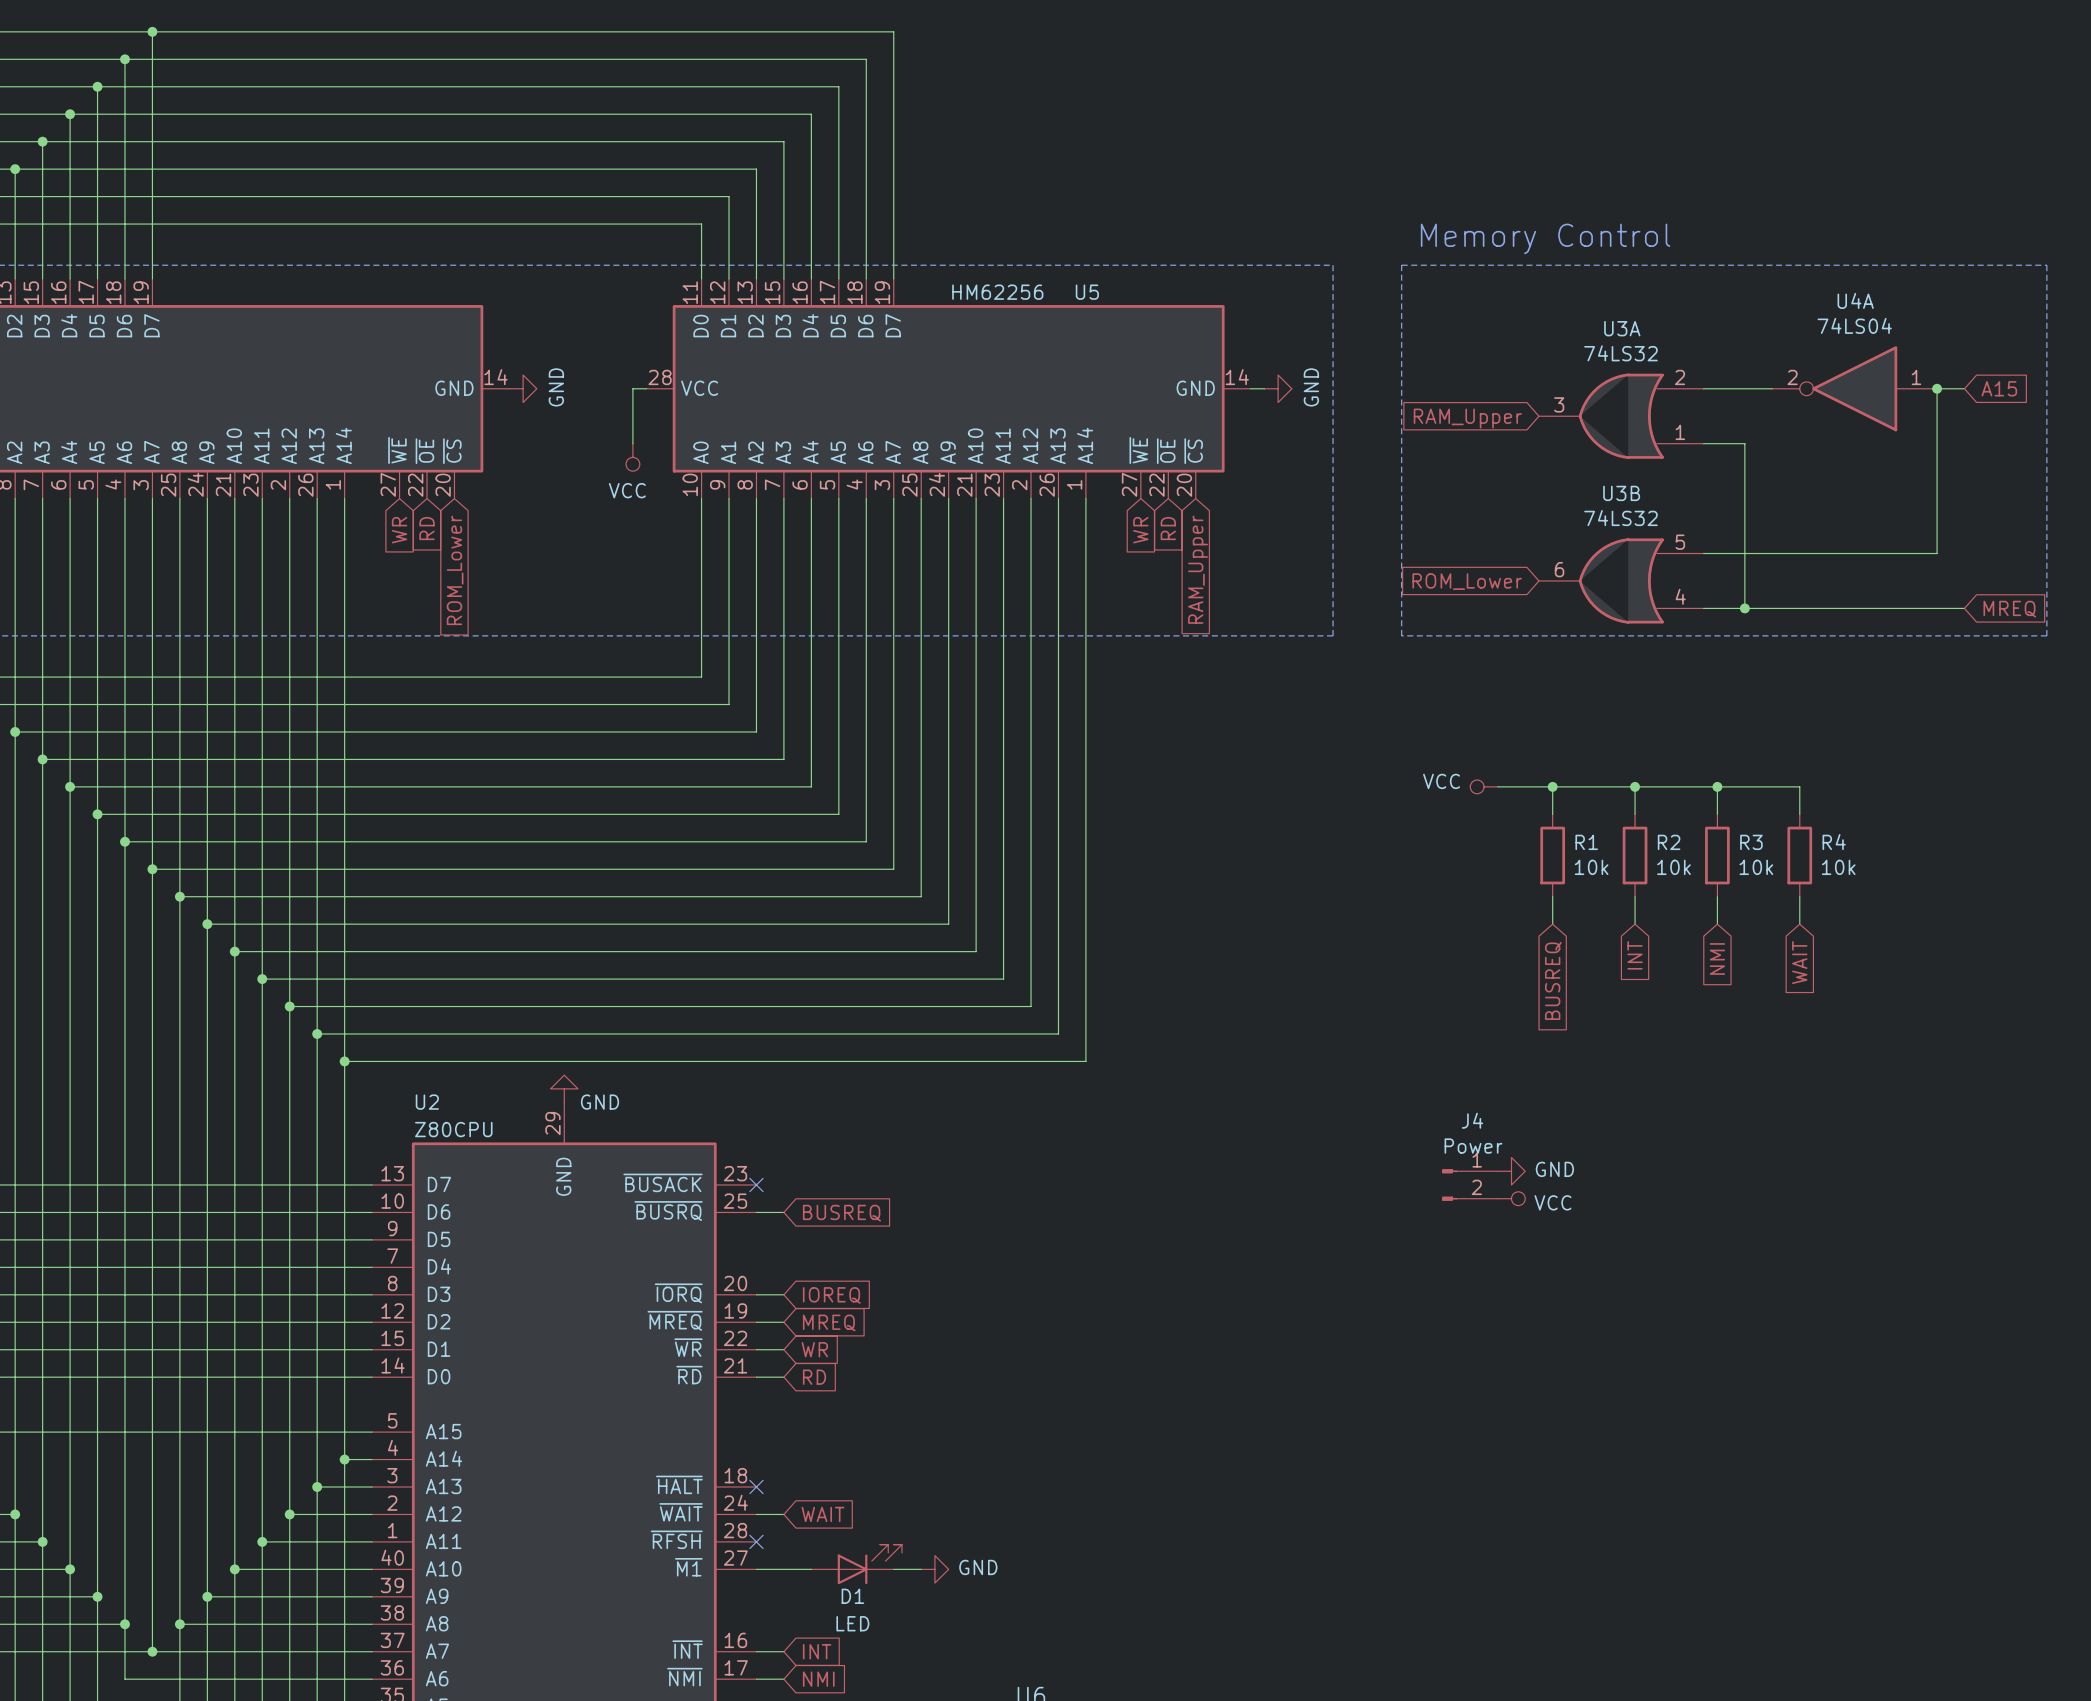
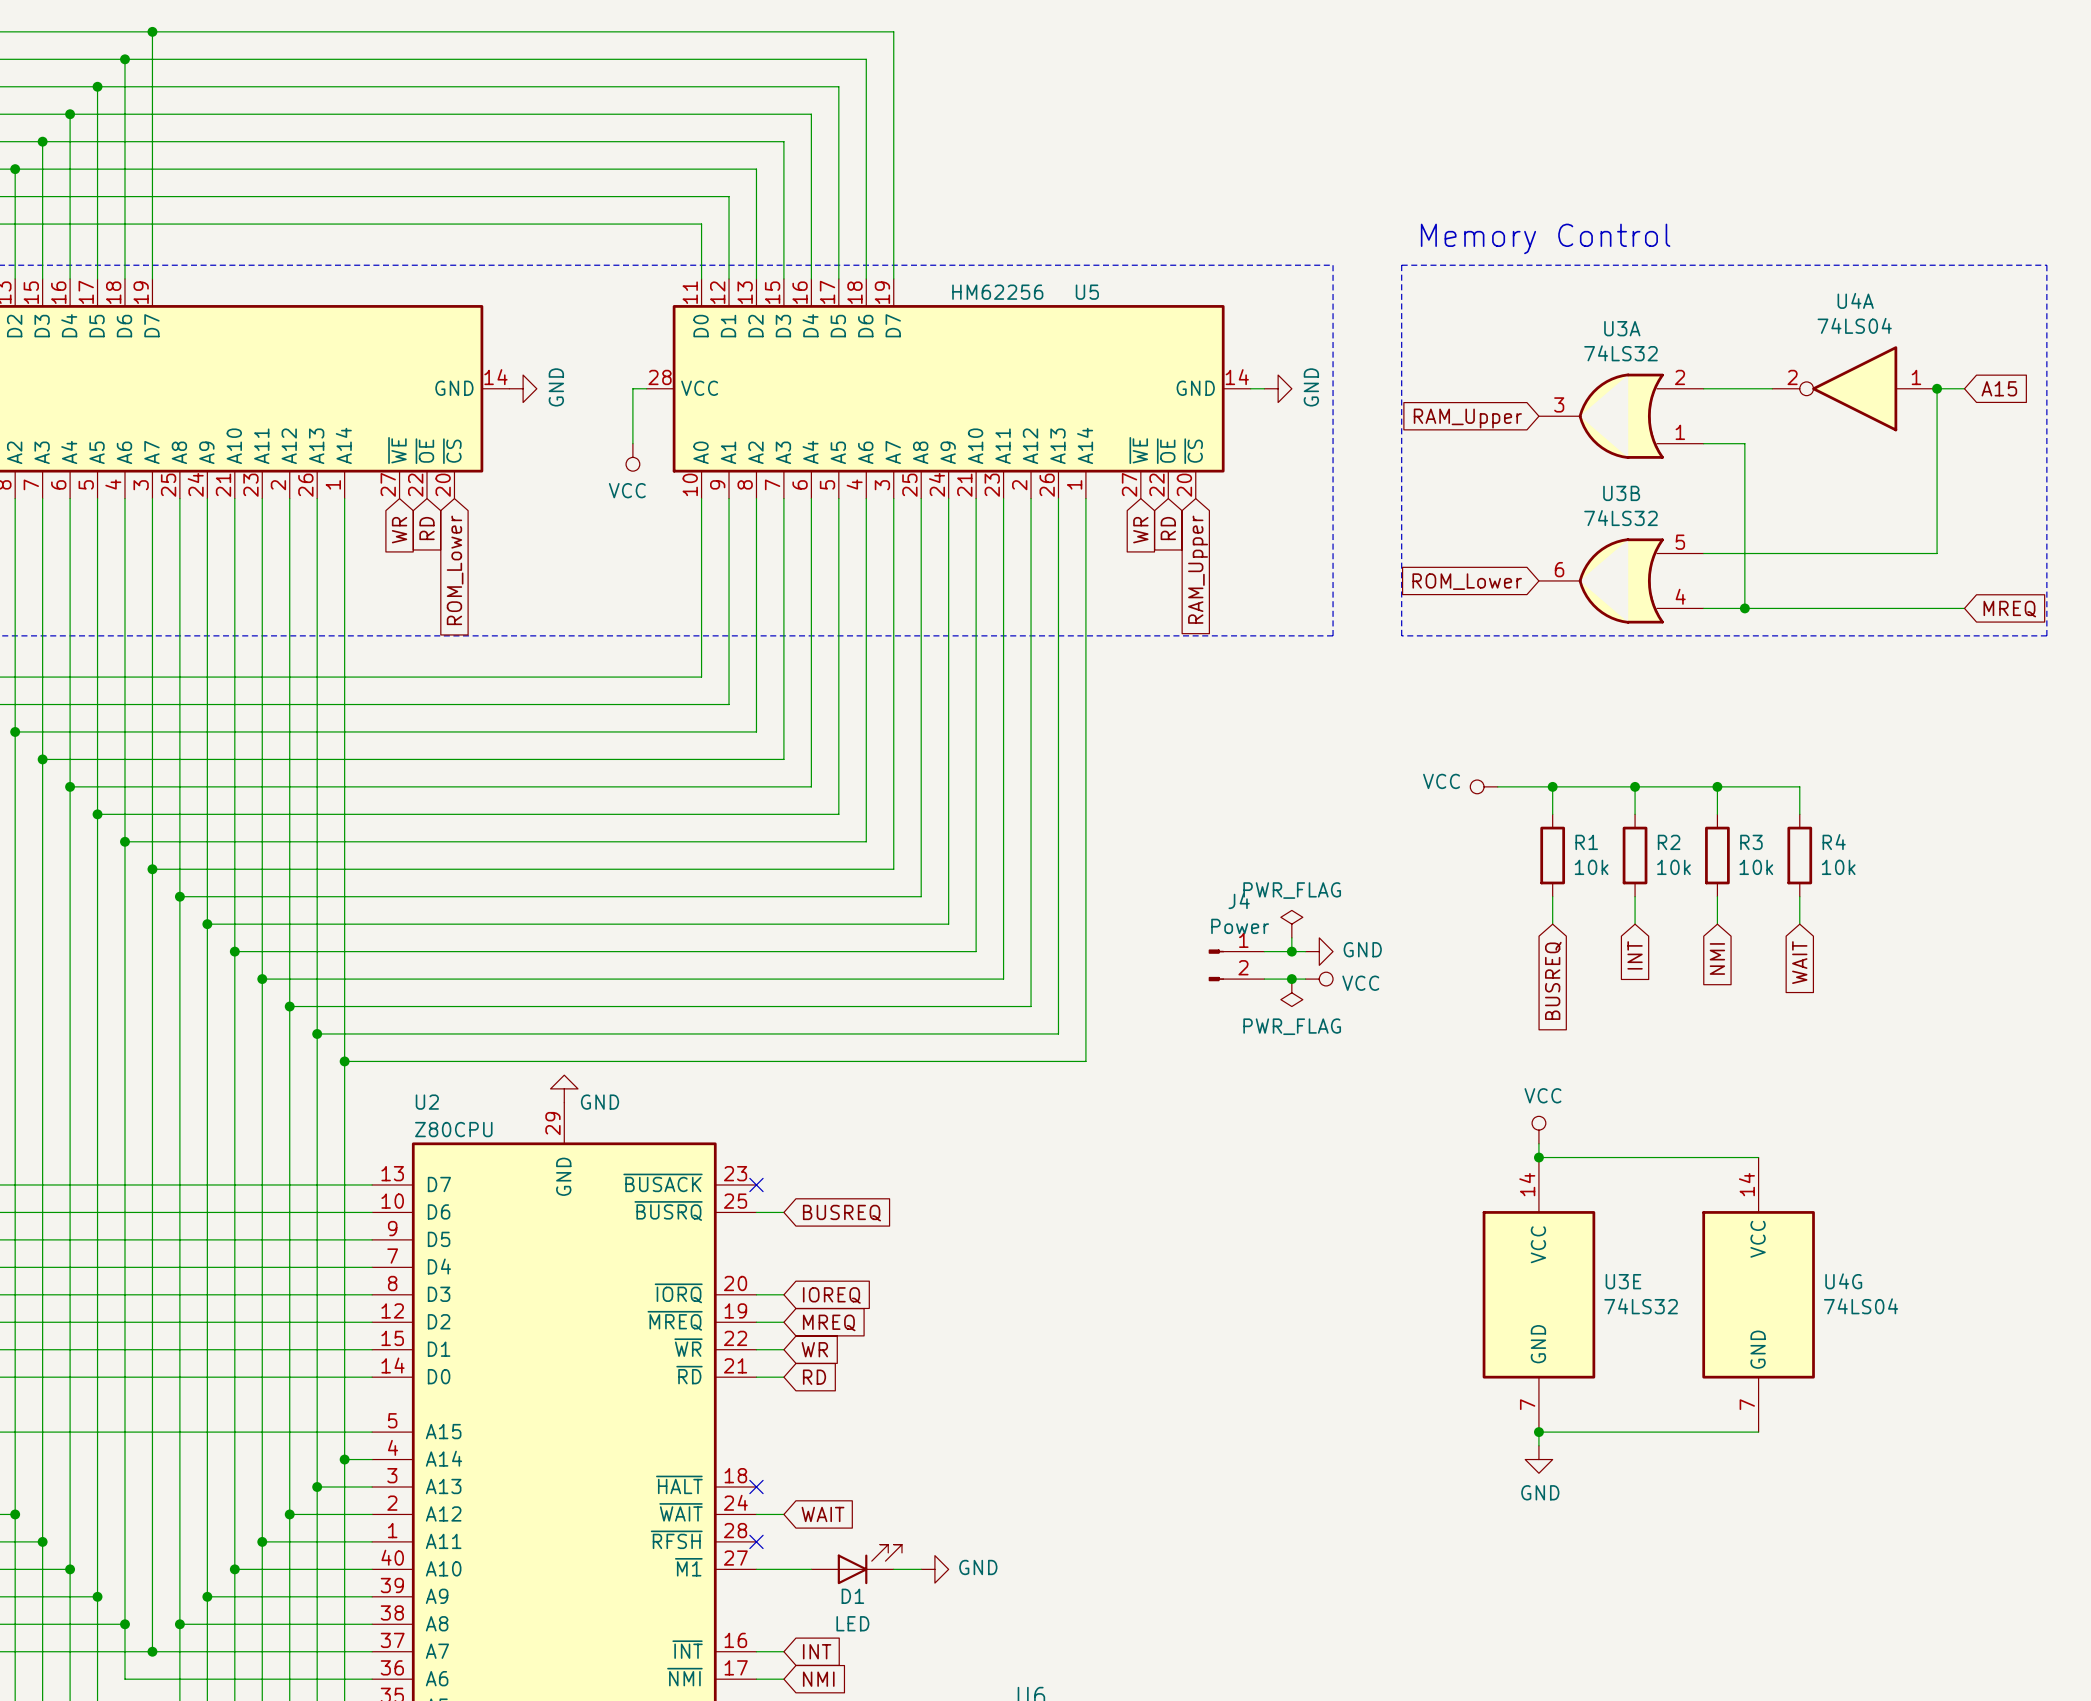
power symbol: none -> PWR_FLAG (1291, 924)
wire: none -> (1291, 937) (1291, 951)
wire: none -> (1264, 951) (1305, 951)
junction: none -> (1291, 951)
power symbol: none -> GND (1319, 951)
wire: none -> (1264, 979) (1305, 979)
junction: none -> (1291, 979)
power symbol: none -> VCC (1319, 979)
power symbol: none -> PWR_FLAG (1291, 992)
wire: none -> (1538, 1143) (1538, 1157) (1758, 1157)
junction: none -> (1538, 1157)
power symbol: GND (1511, 1171) -> none
J4 position: (1469, 1184) -> (1236, 965)
power symbol rotation: 0° (1511, 1198) -> 90° counterclockwise (1538, 1130)
power symbol position: VCC (1511, 1198) -> VCC (1538, 1130)
U3E: none -> 74LS32 (1538, 1294)
U4G: none -> 74LS04 (1758, 1294)
junction: none -> (1538, 1432)
wire: none -> (1758, 1432) (1538, 1432) (1538, 1445)
power symbol: none -> GND (1538, 1459)

